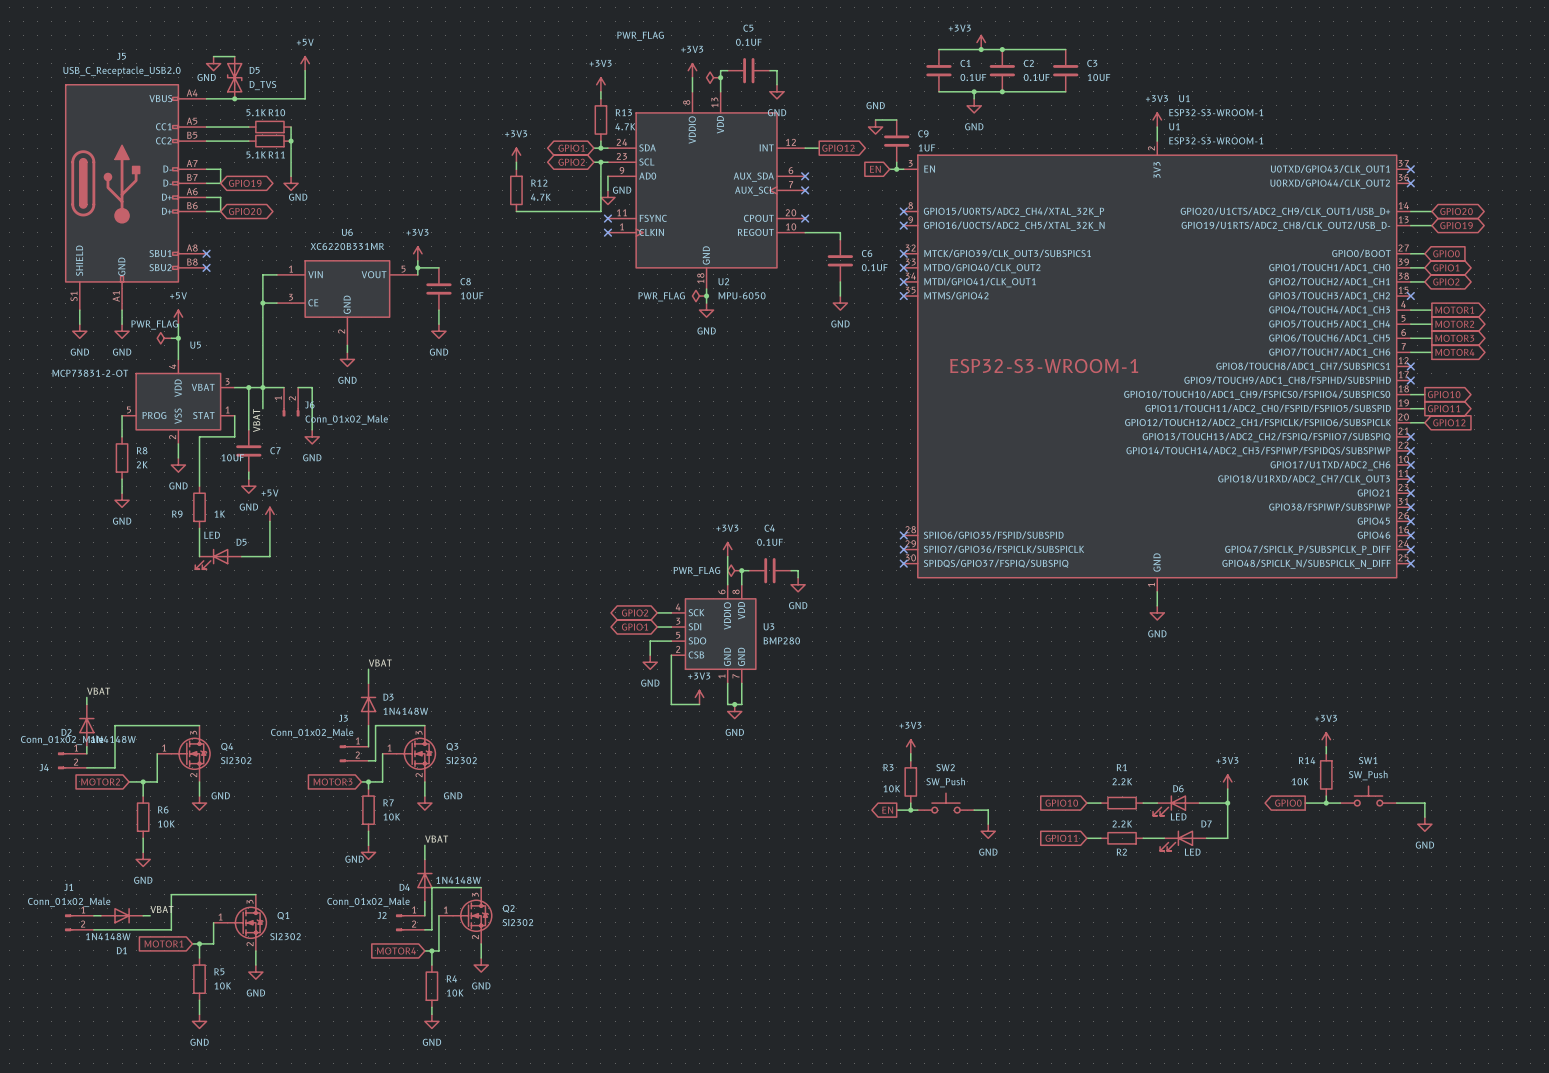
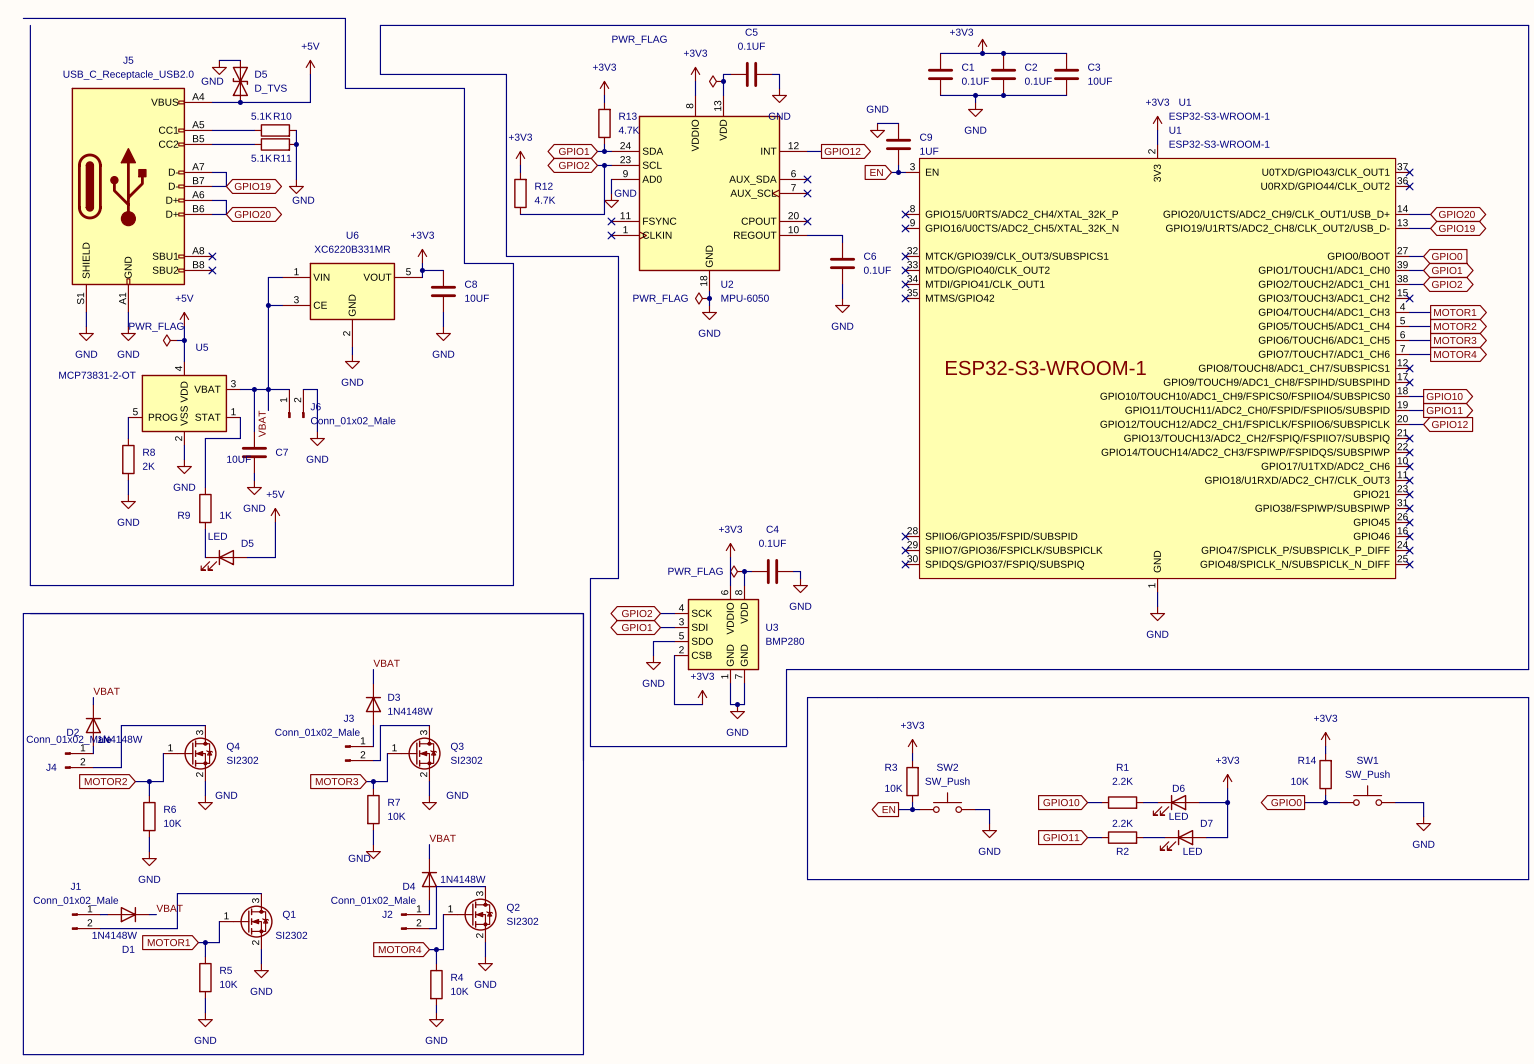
line: none -> (23, 18) (345, 18) (345, 88) (464, 88) (464, 263) (513, 263) (513, 585) (30, 585) (30, 25)
line: none -> (380, 25) (1528, 25) (1528, 669) (786, 669) (786, 746) (590, 746) (590, 578) (618, 578) (618, 256) (506, 256) (506, 74) (380, 74) (380, 25)
line: none -> (23, 613) (583, 613) (583, 1054) (23, 1054) (23, 613)
line: none -> (807, 697) (1528, 697) (1528, 879) (807, 879) (807, 697)

